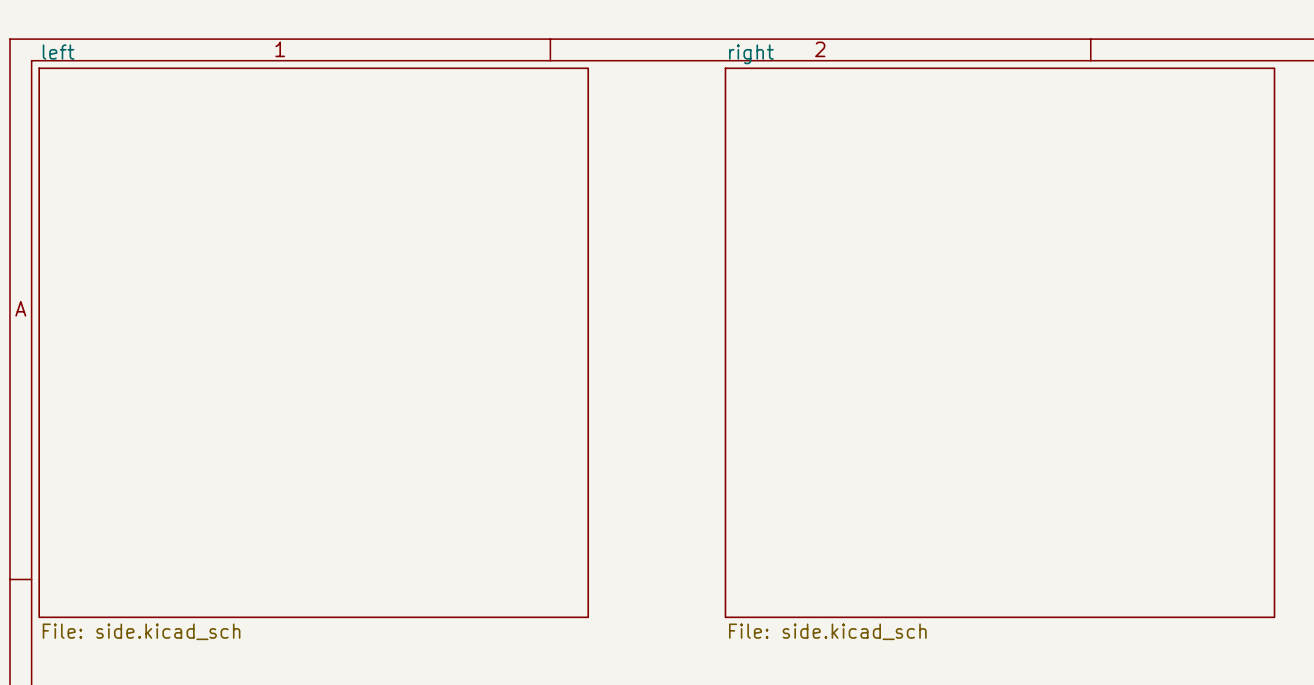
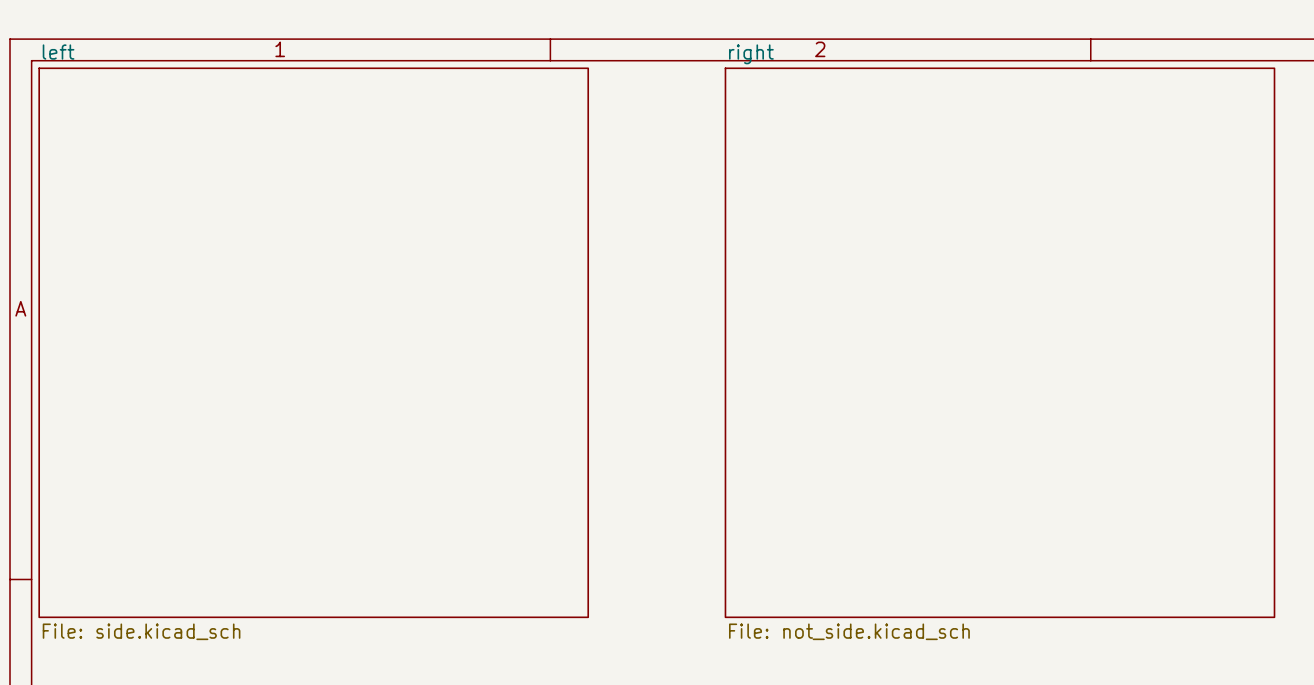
sheet right value: File: side.kicad_sch (827, 631) -> File: not_side.kicad_sch (849, 631)

